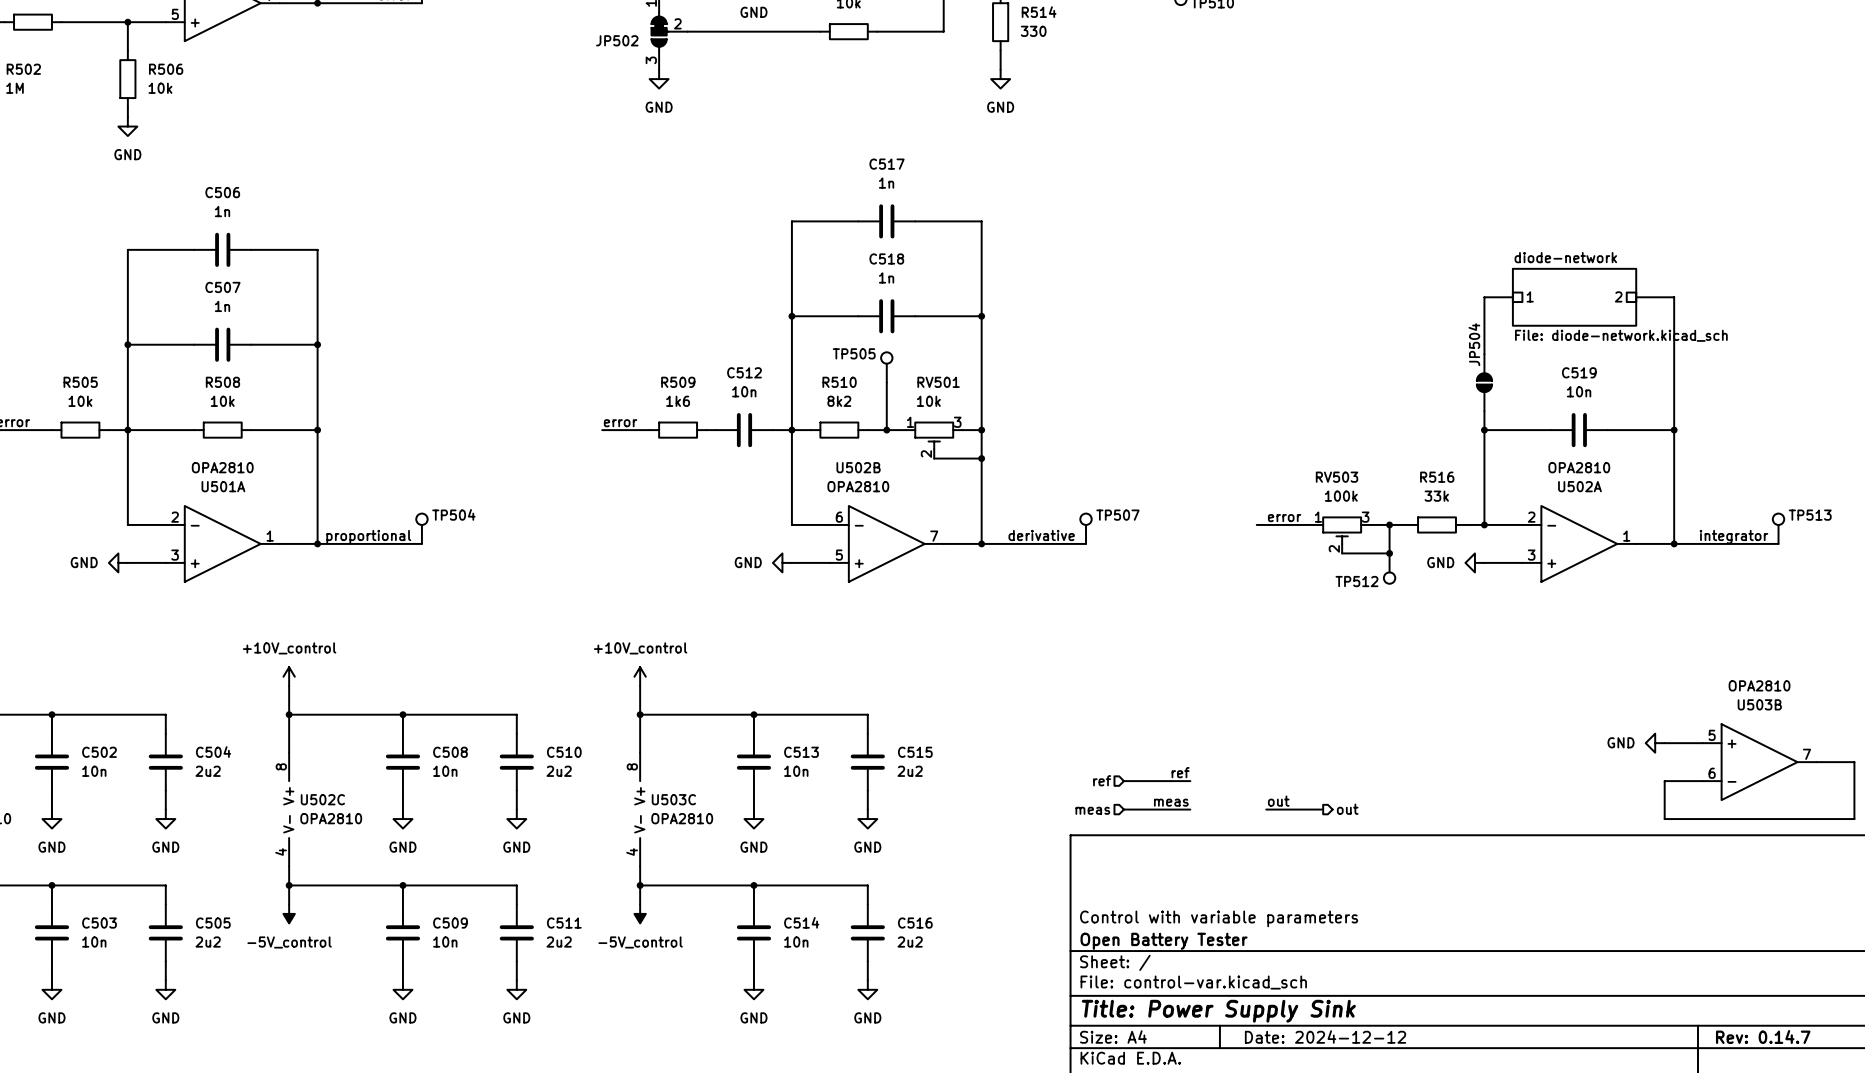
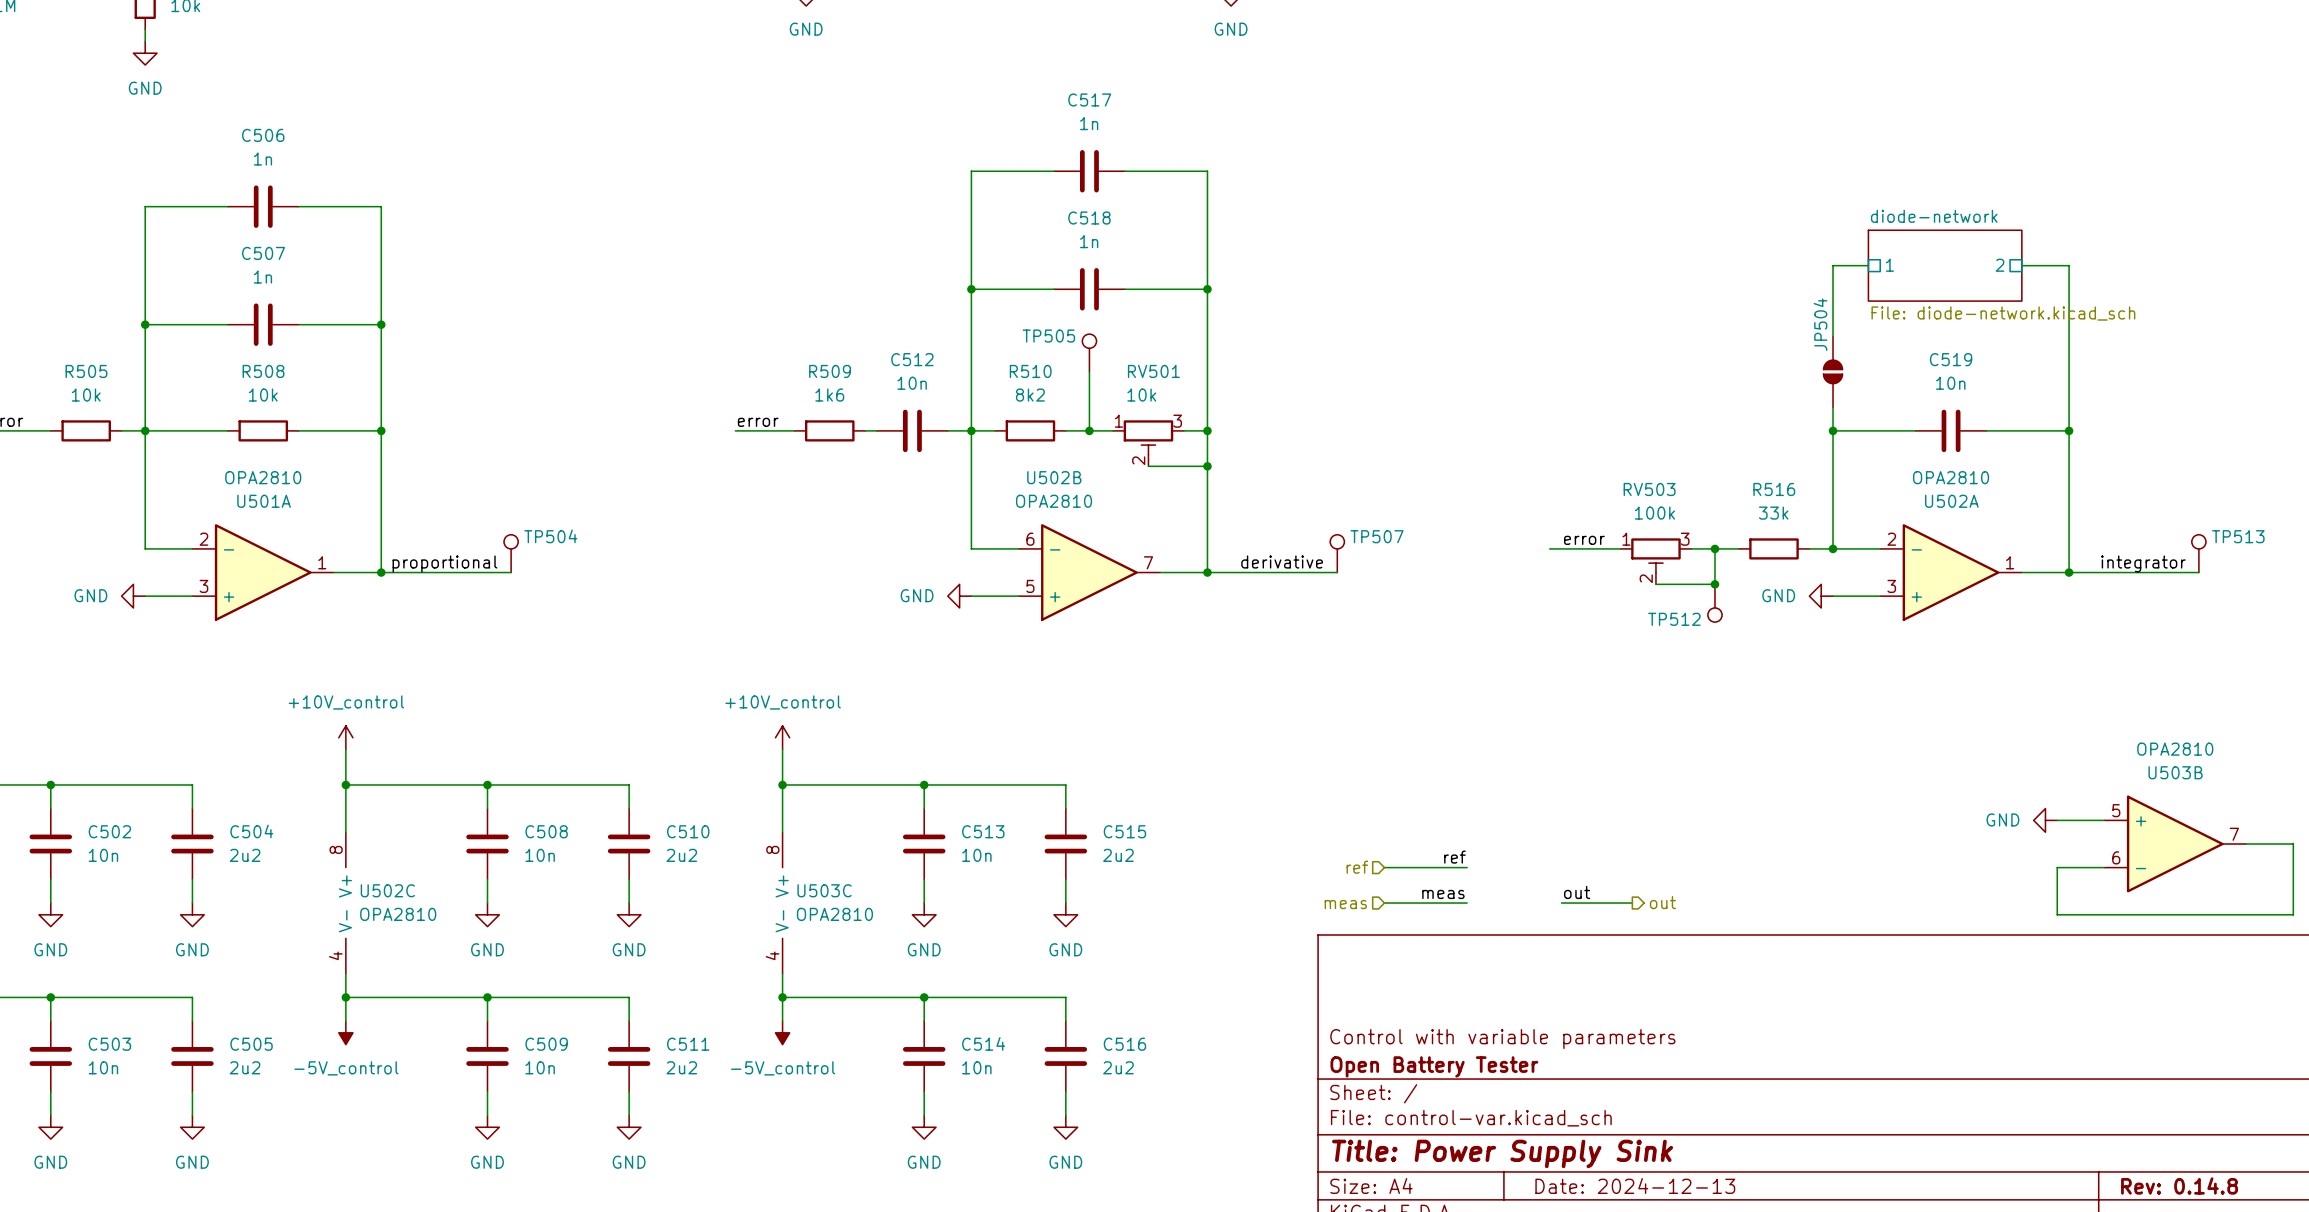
title block: Date: 2024-12-12 (1325, 1037) -> Date: 2024-12-13 (1635, 1185)
title block: Rev: 0.14.7 (1763, 1037) -> Rev: 0.14.8 (2179, 1185)

